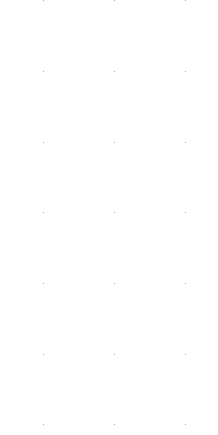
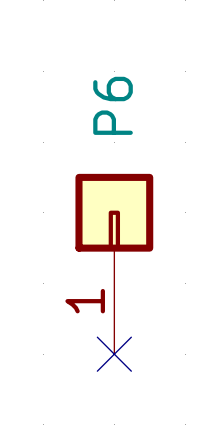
P6: none -> (114, 264)
no-connect mark: none -> (114, 354)

